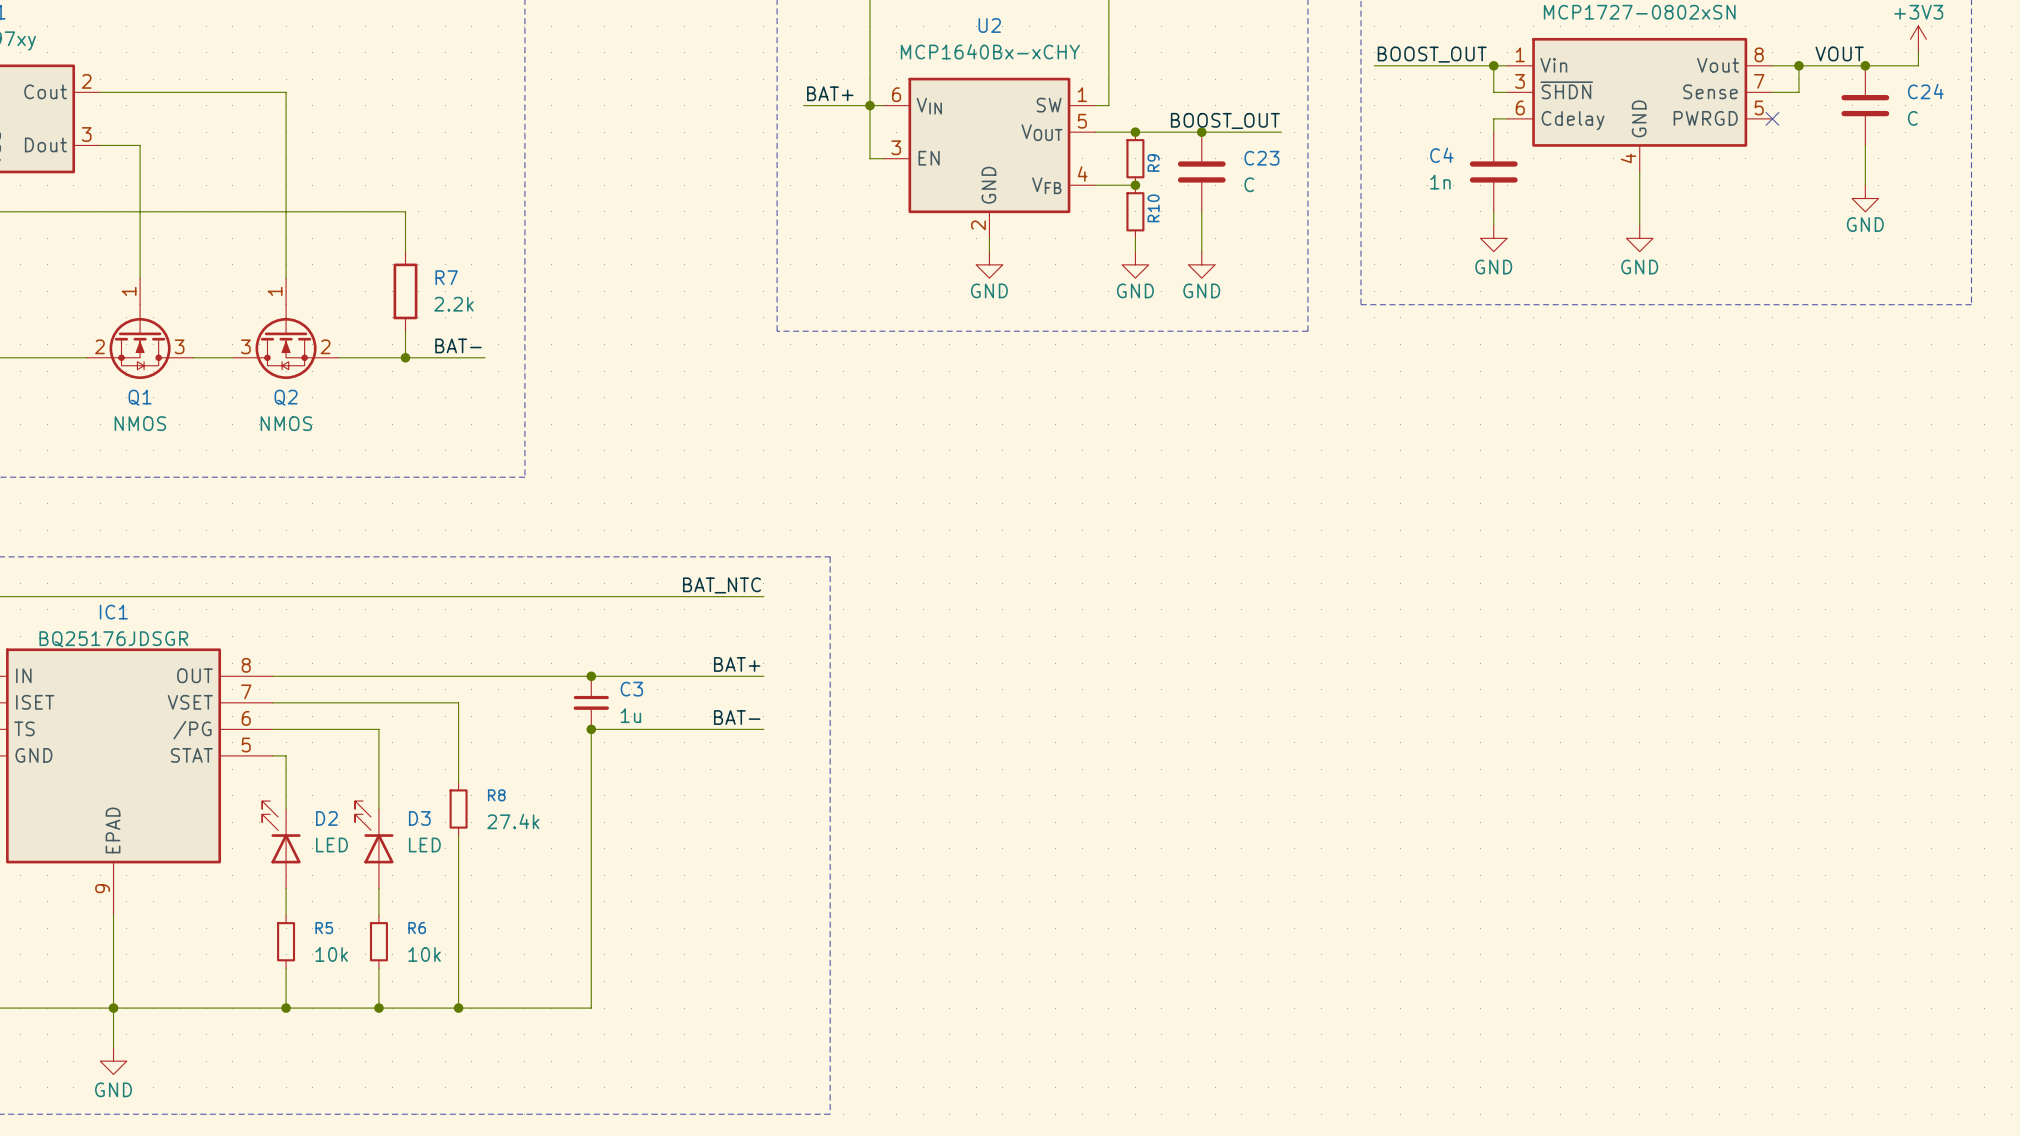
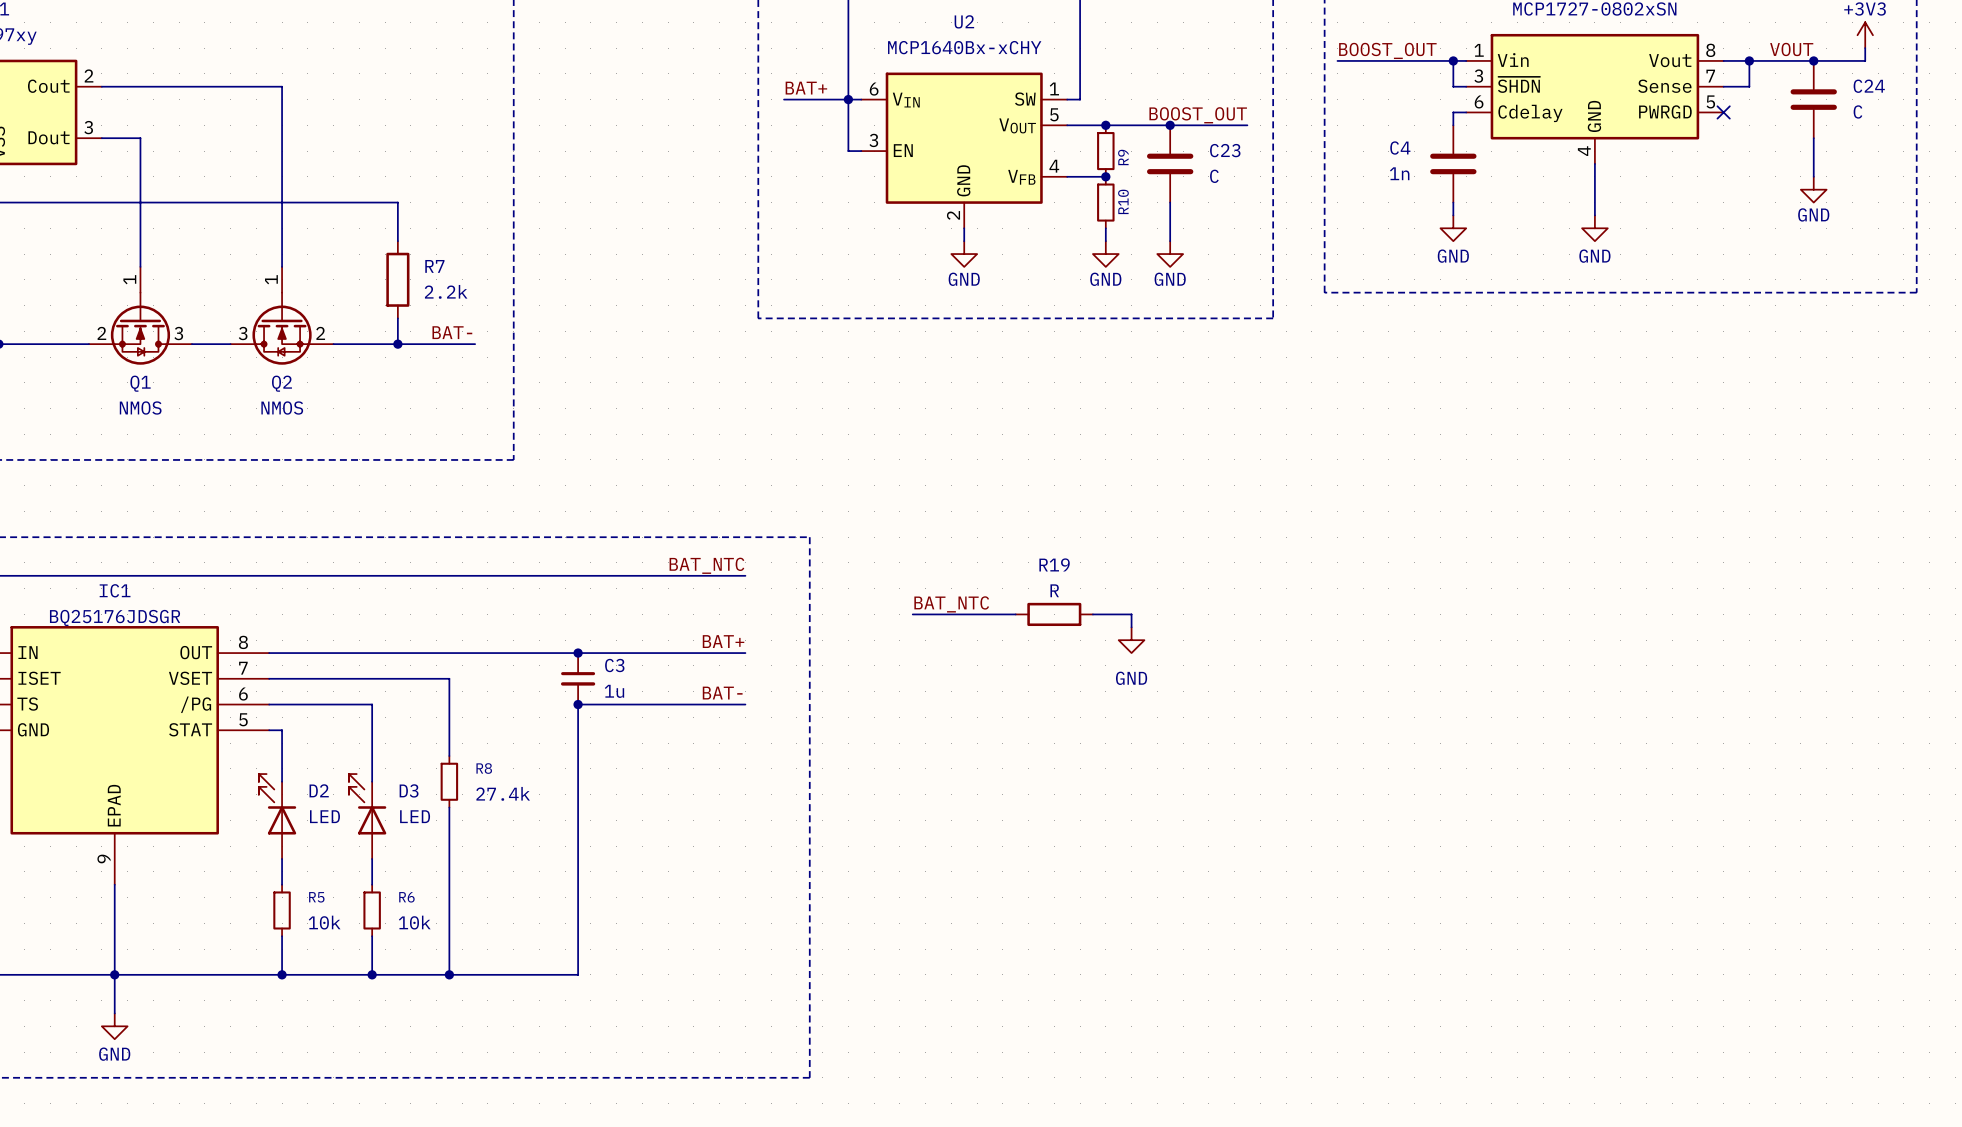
label: none -> BAT_NTC (951, 604)
wire: none -> (912, 614) (1015, 614)
R19: none -> R (1054, 614)
wire: none -> (1092, 614) (1131, 614) (1131, 627)
power symbol: none -> GND (1131, 640)

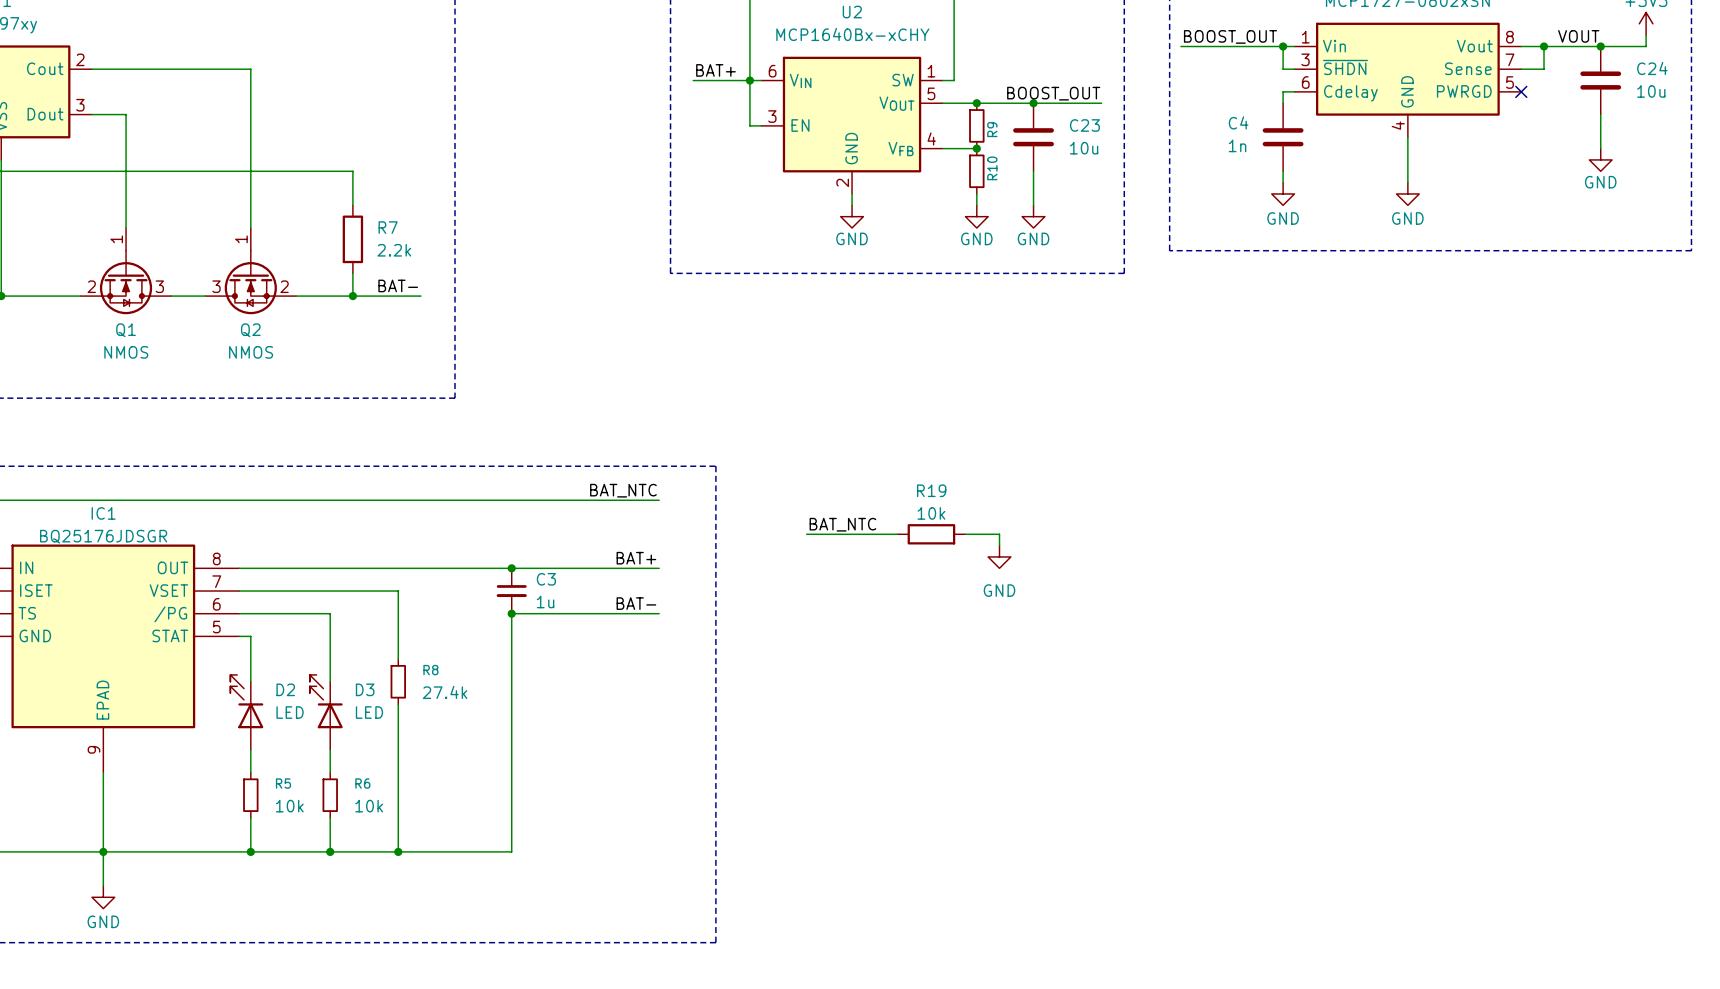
C24 value: C (1857, 111) -> 10u (1651, 91)
C23 value: C (1214, 176) -> 10u (1084, 148)
R19 value: R (1054, 590) -> 10k (931, 513)

